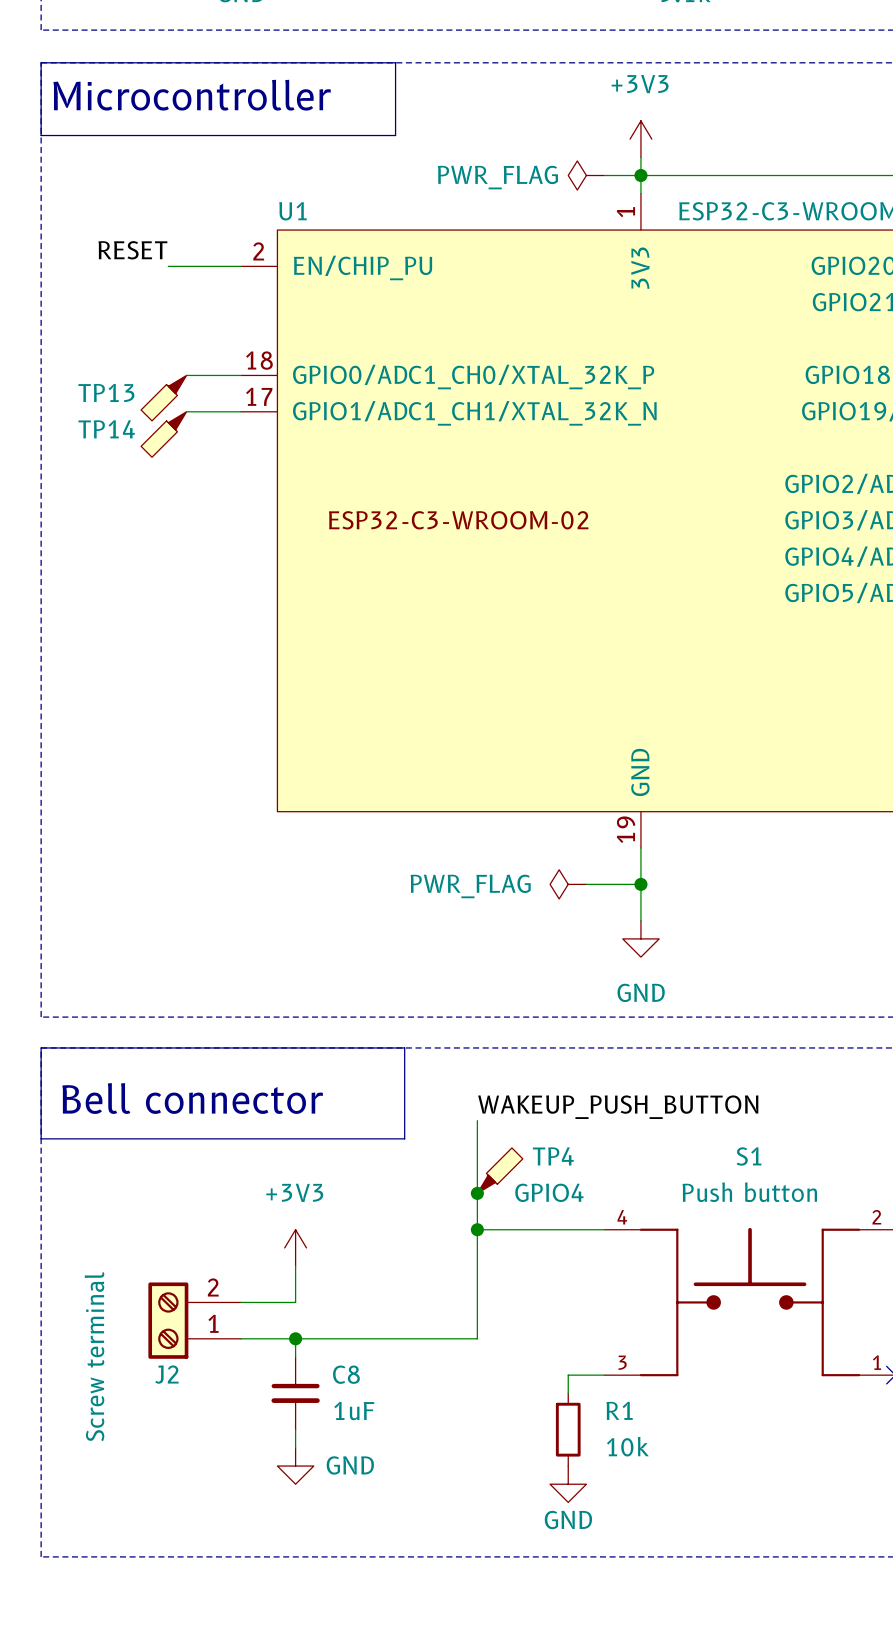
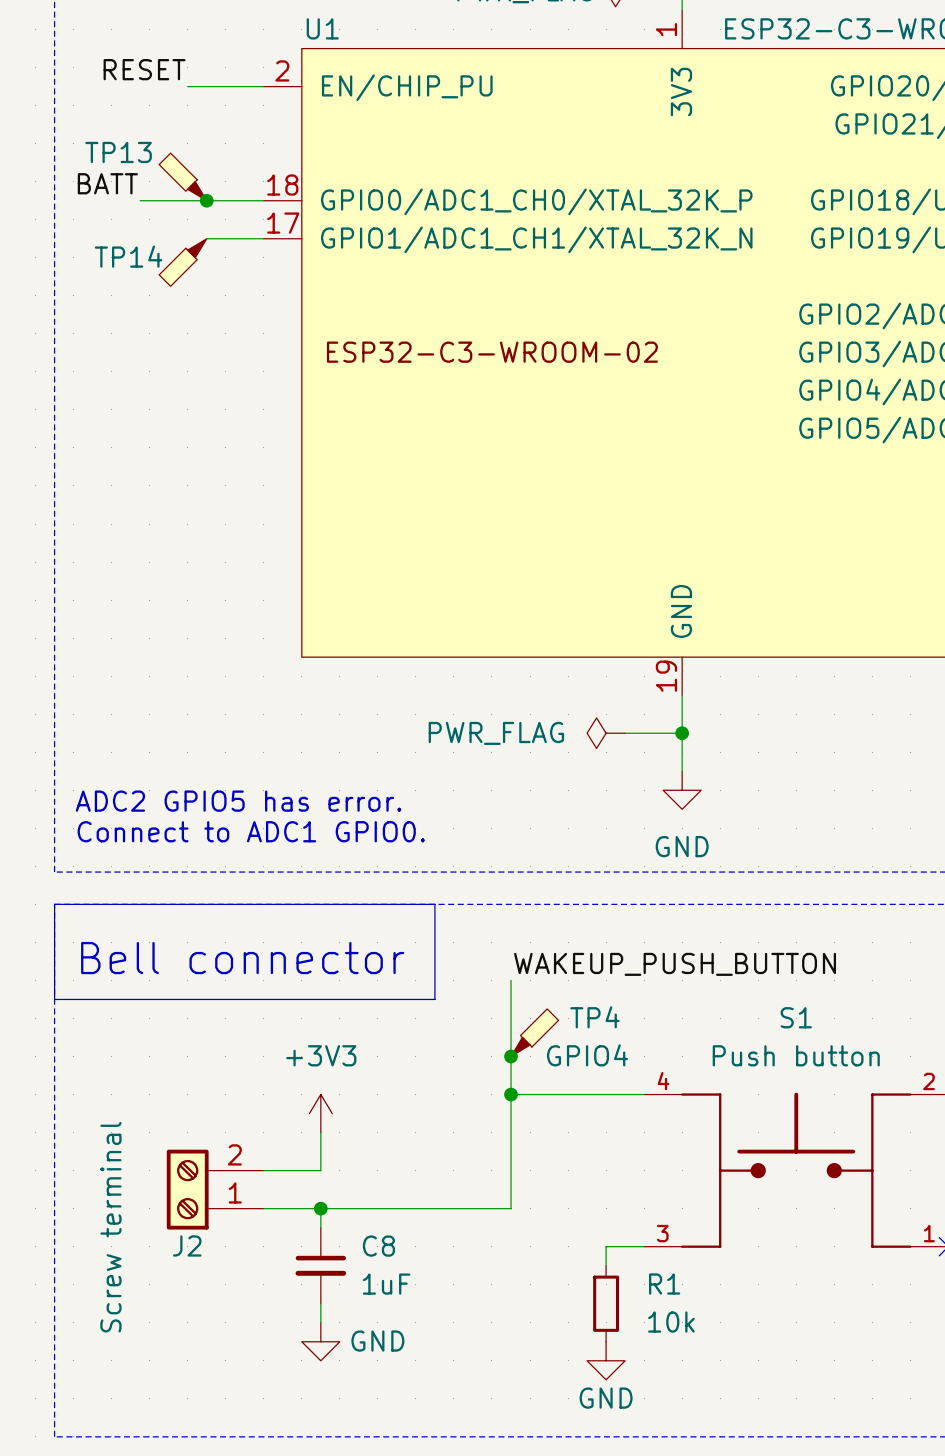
label: none -> BATT (107, 183)
wire: none -> (140, 200) (206, 200)
junction: none -> (206, 200)
TP13 rotation: 0° (163, 398) -> 90° clockwise (182, 176)
TP13 position: (163, 398) -> (182, 176)
text: none -> ADC2 GPIO5 has error. (238, 801)
text: none -> Connect to ADC1 GPIO0. (251, 831)

